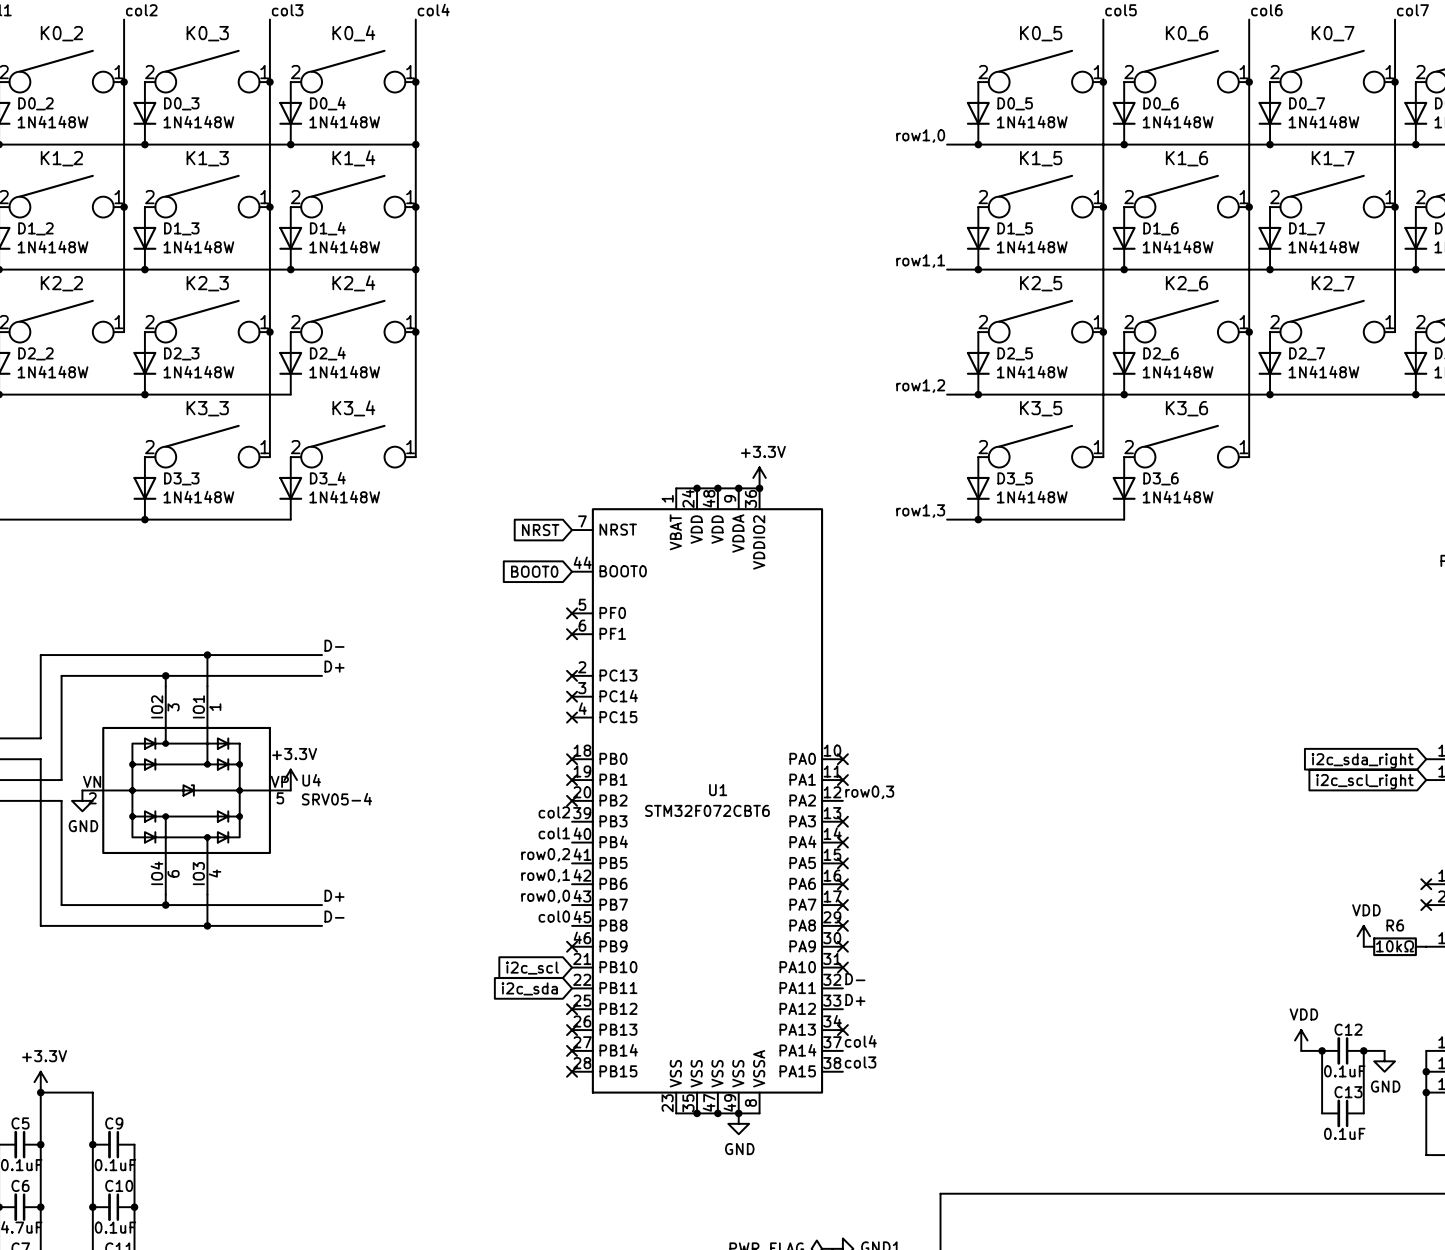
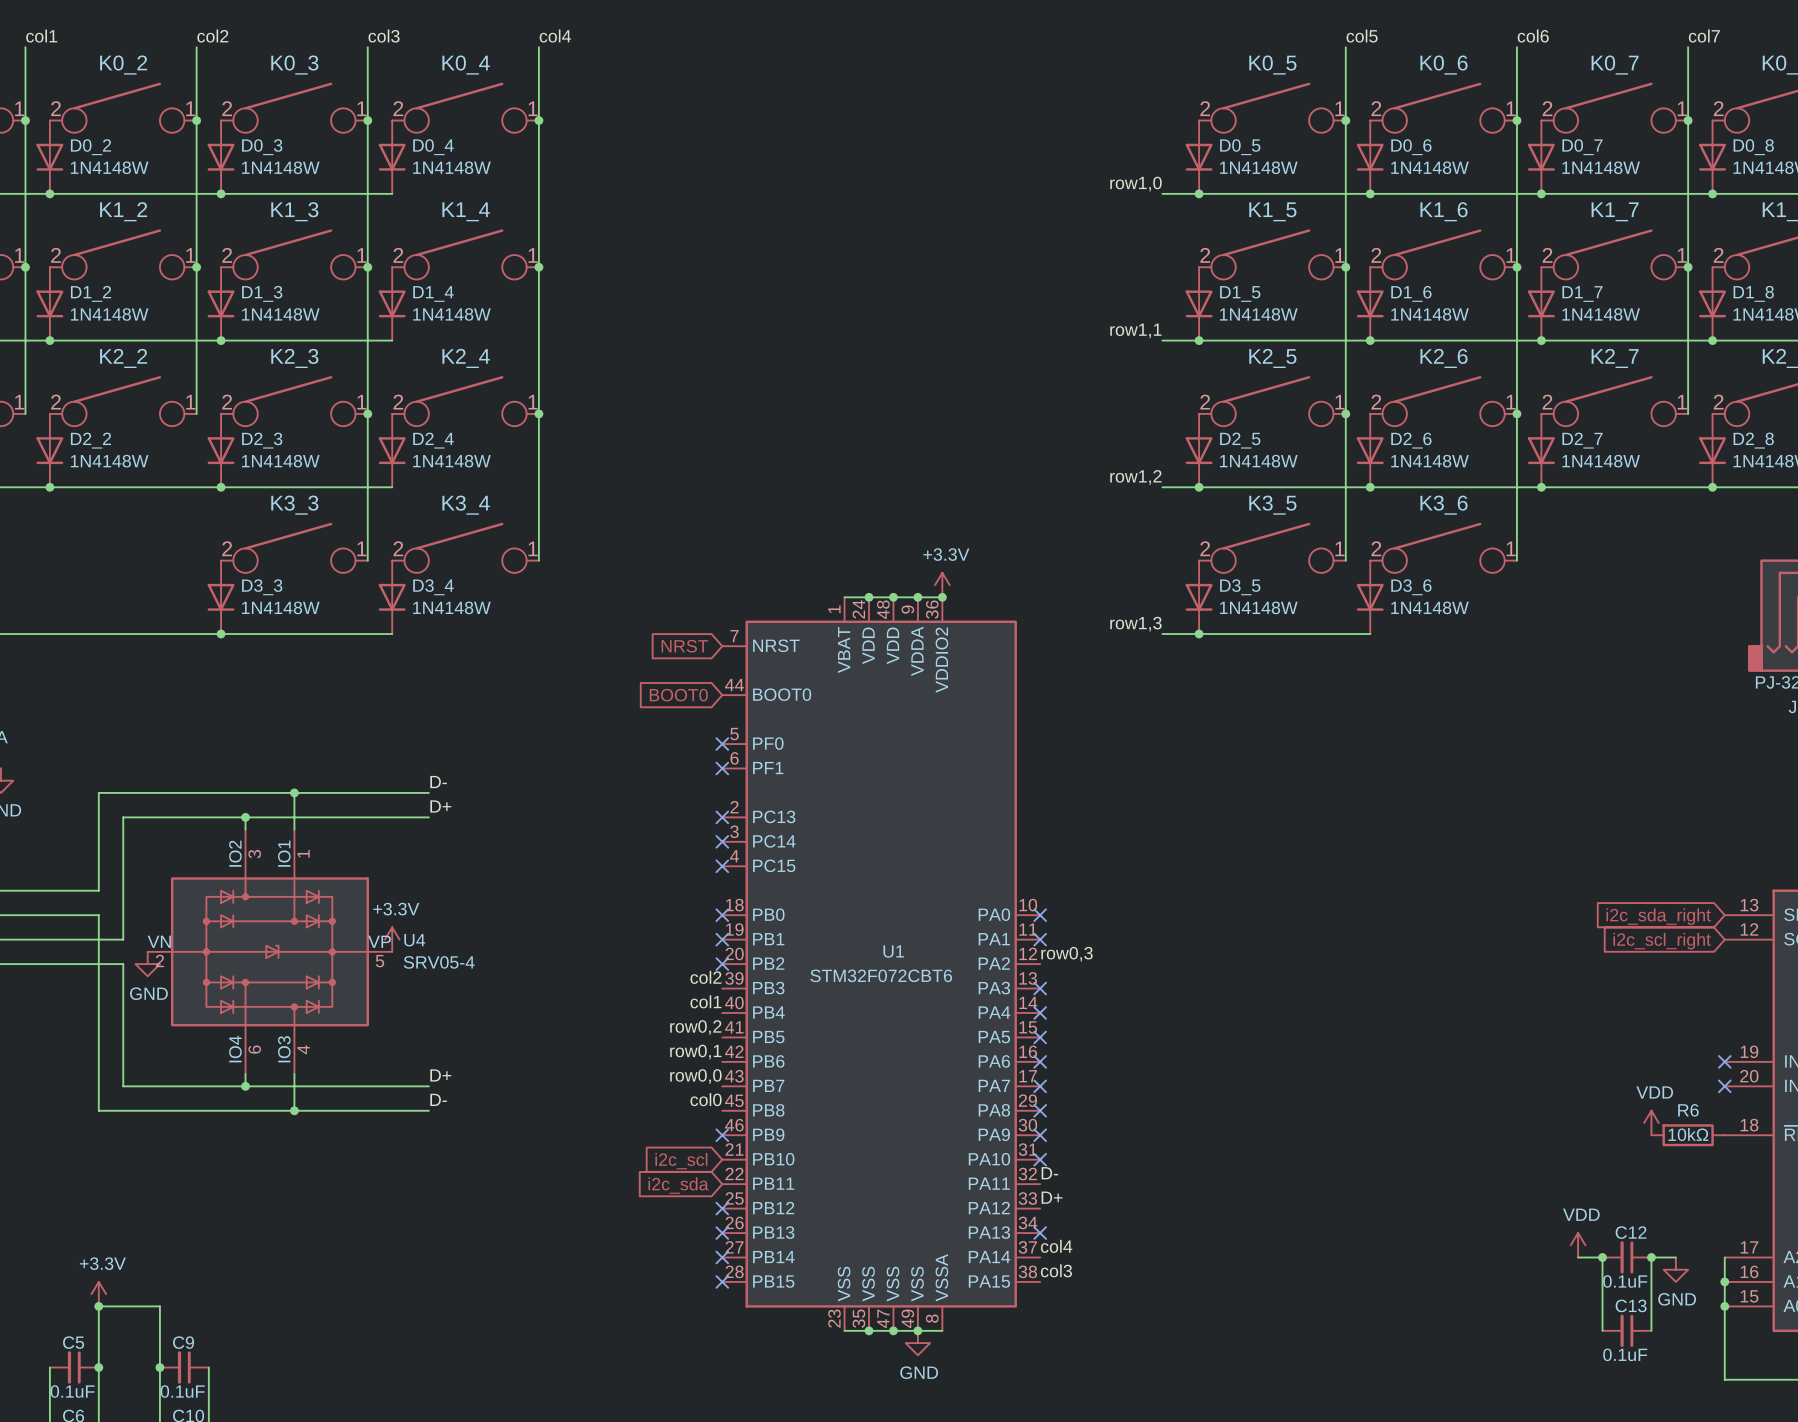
wire: (290, 144) (415, 144) -> none
junction: (290, 144) -> none
junction: (415, 144) -> none
wire: (290, 269) (415, 269) -> none
junction: (290, 269) -> none
junction: (415, 269) -> none

